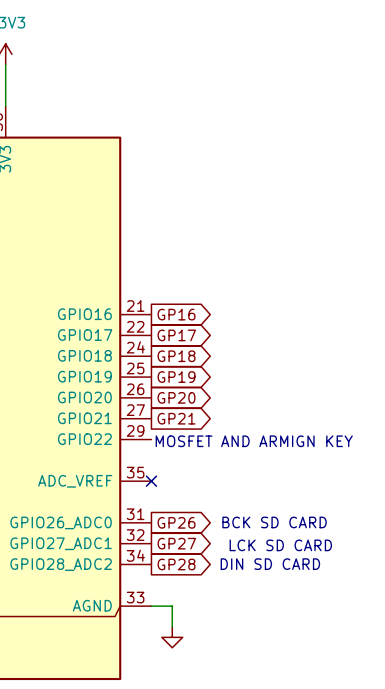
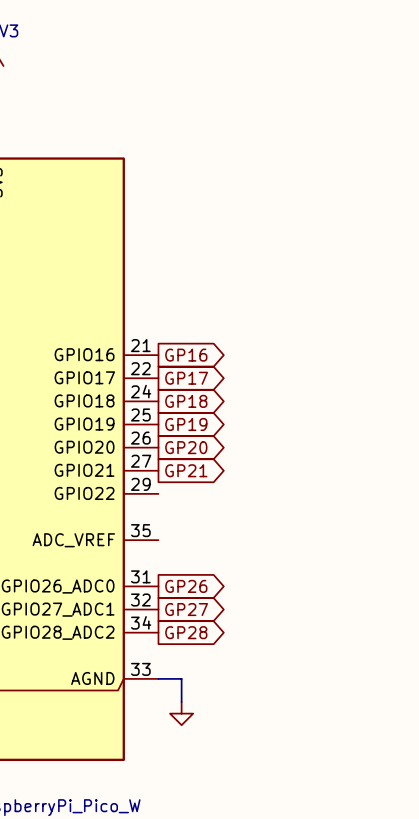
text: MOSFET AND ARMIGN KEY (254, 441) -> none
no-connect mark: (151, 481) -> none
text: BCK SD CARD (274, 522) -> none
text: LCK SD CARD (280, 545) -> none
text: DIN SD CARD (270, 564) -> none

